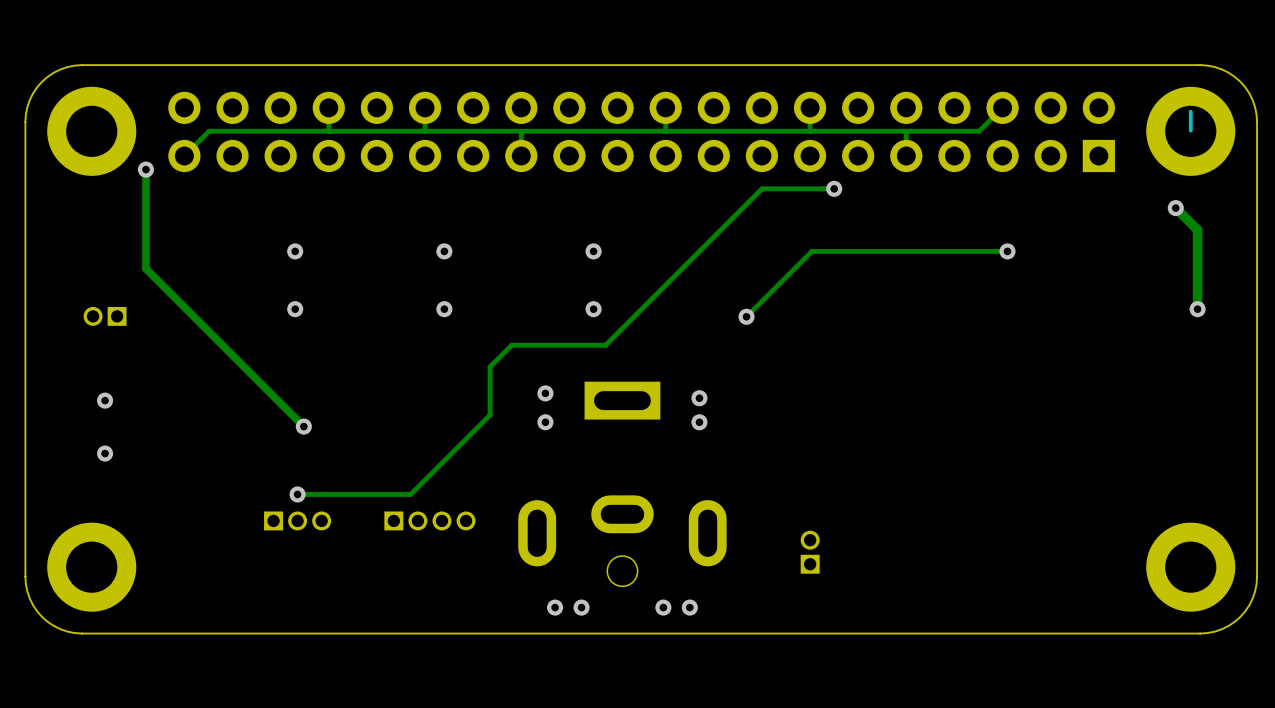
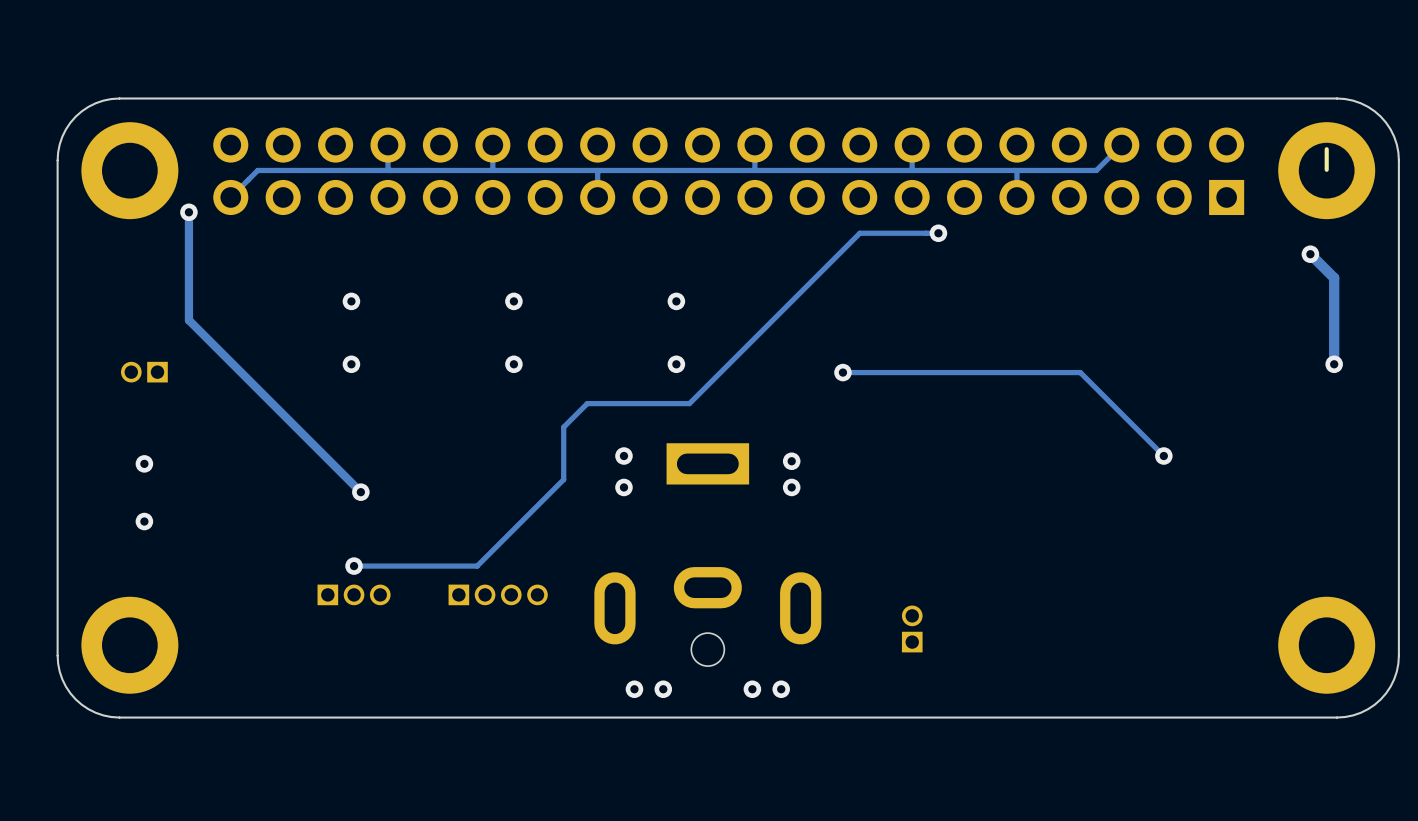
track: (1007, 251) (811, 251) (746, 316) -> (1163, 456) (1080, 372) (842, 372)
via: (1007, 251) -> none
via: none -> (1163, 456)

